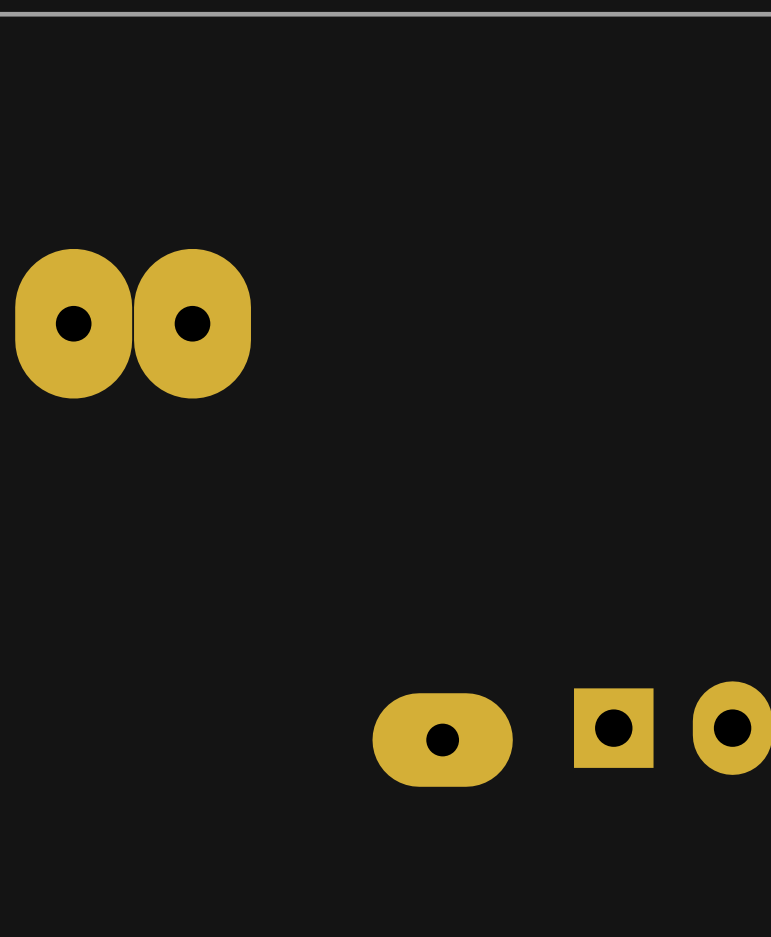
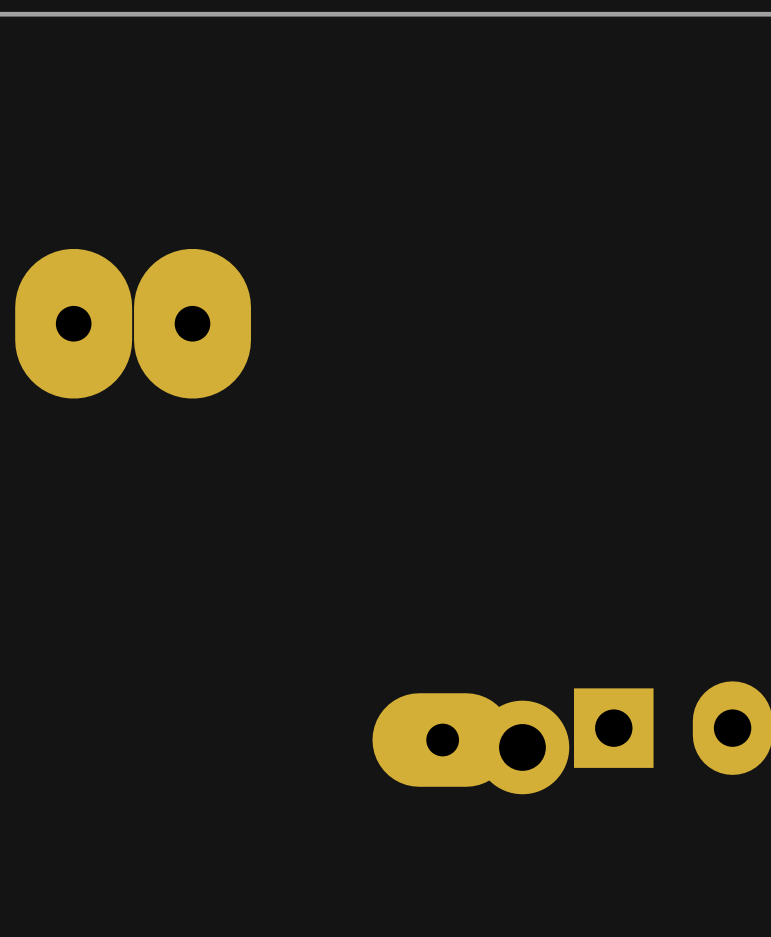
part: none -> (522, 747)

